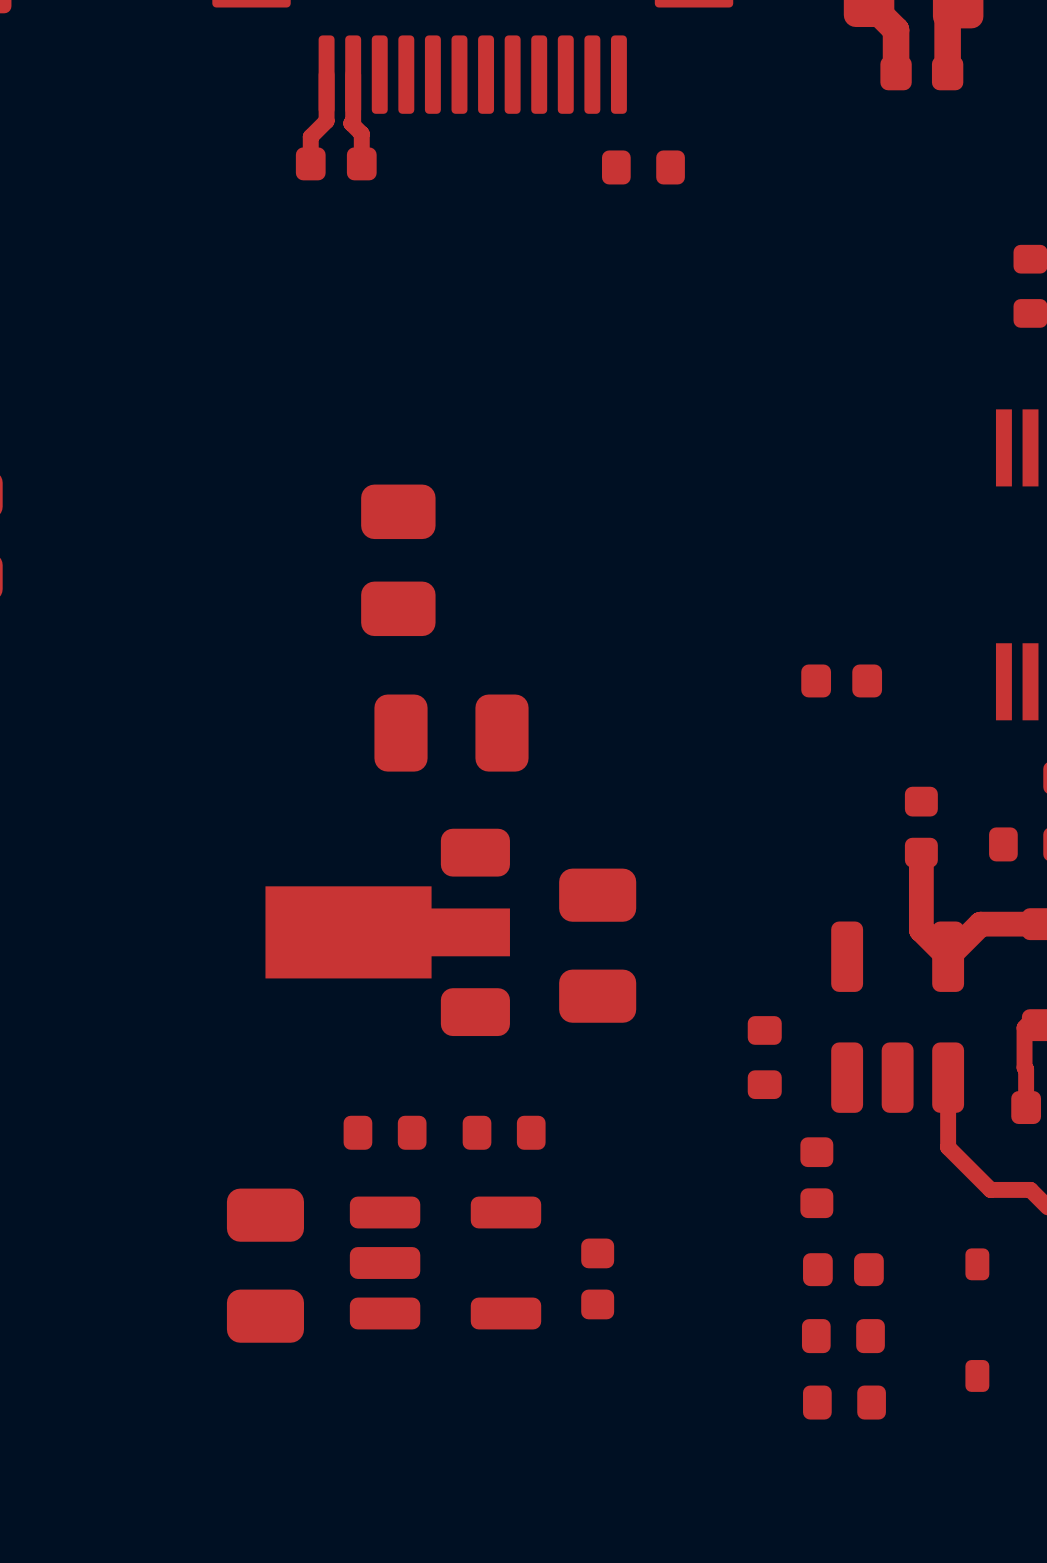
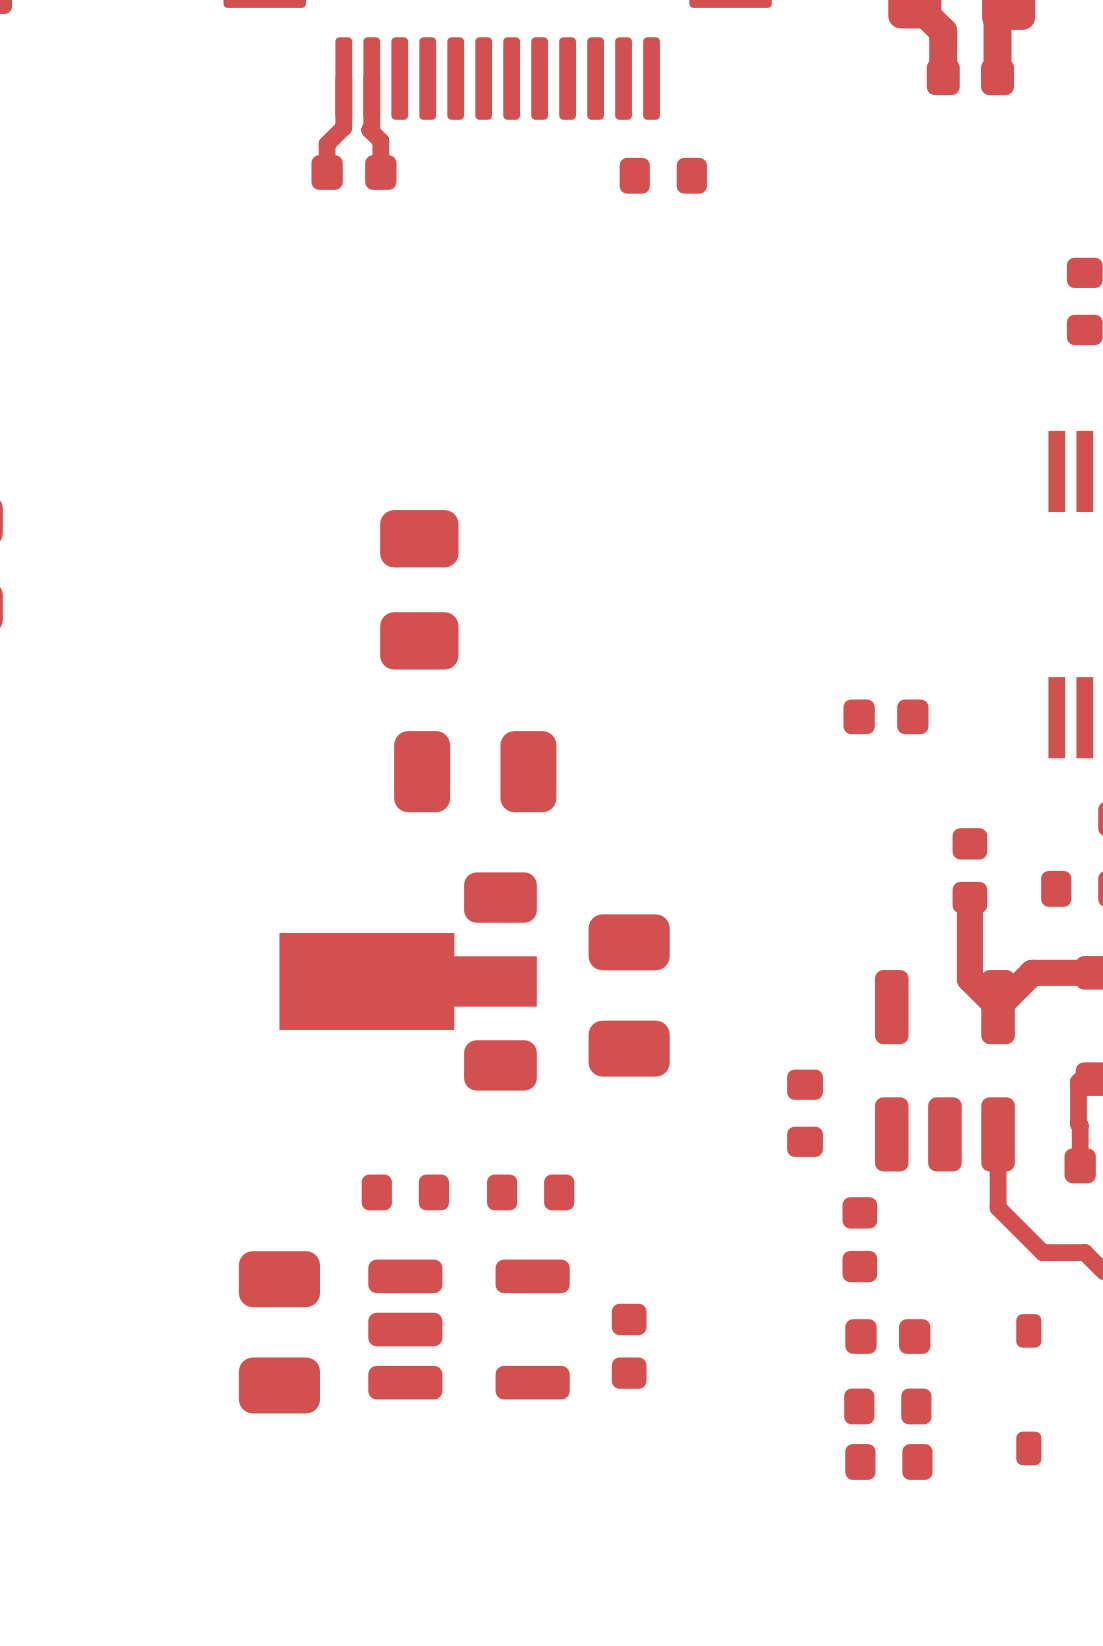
part position: (643, 167) -> (663, 175)
part position: (844, 1402) -> (888, 1461)

